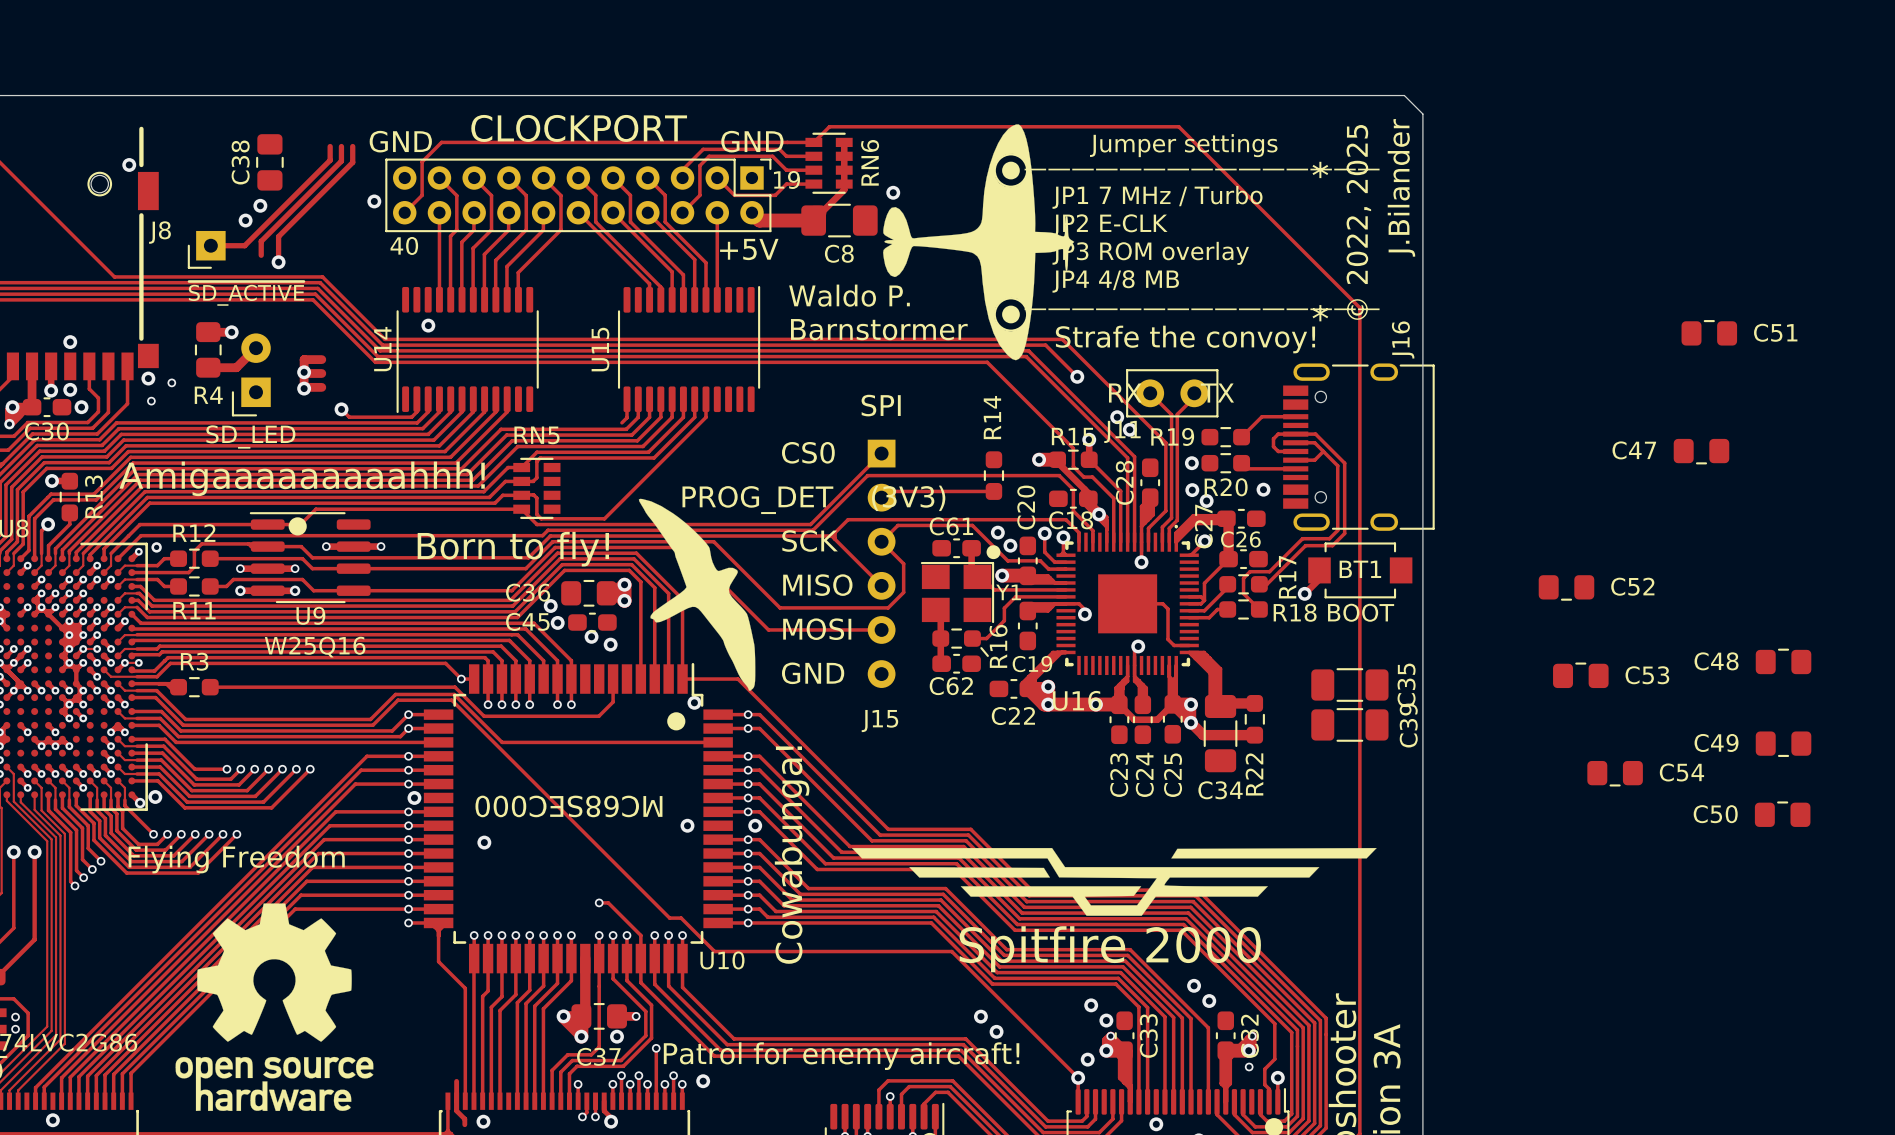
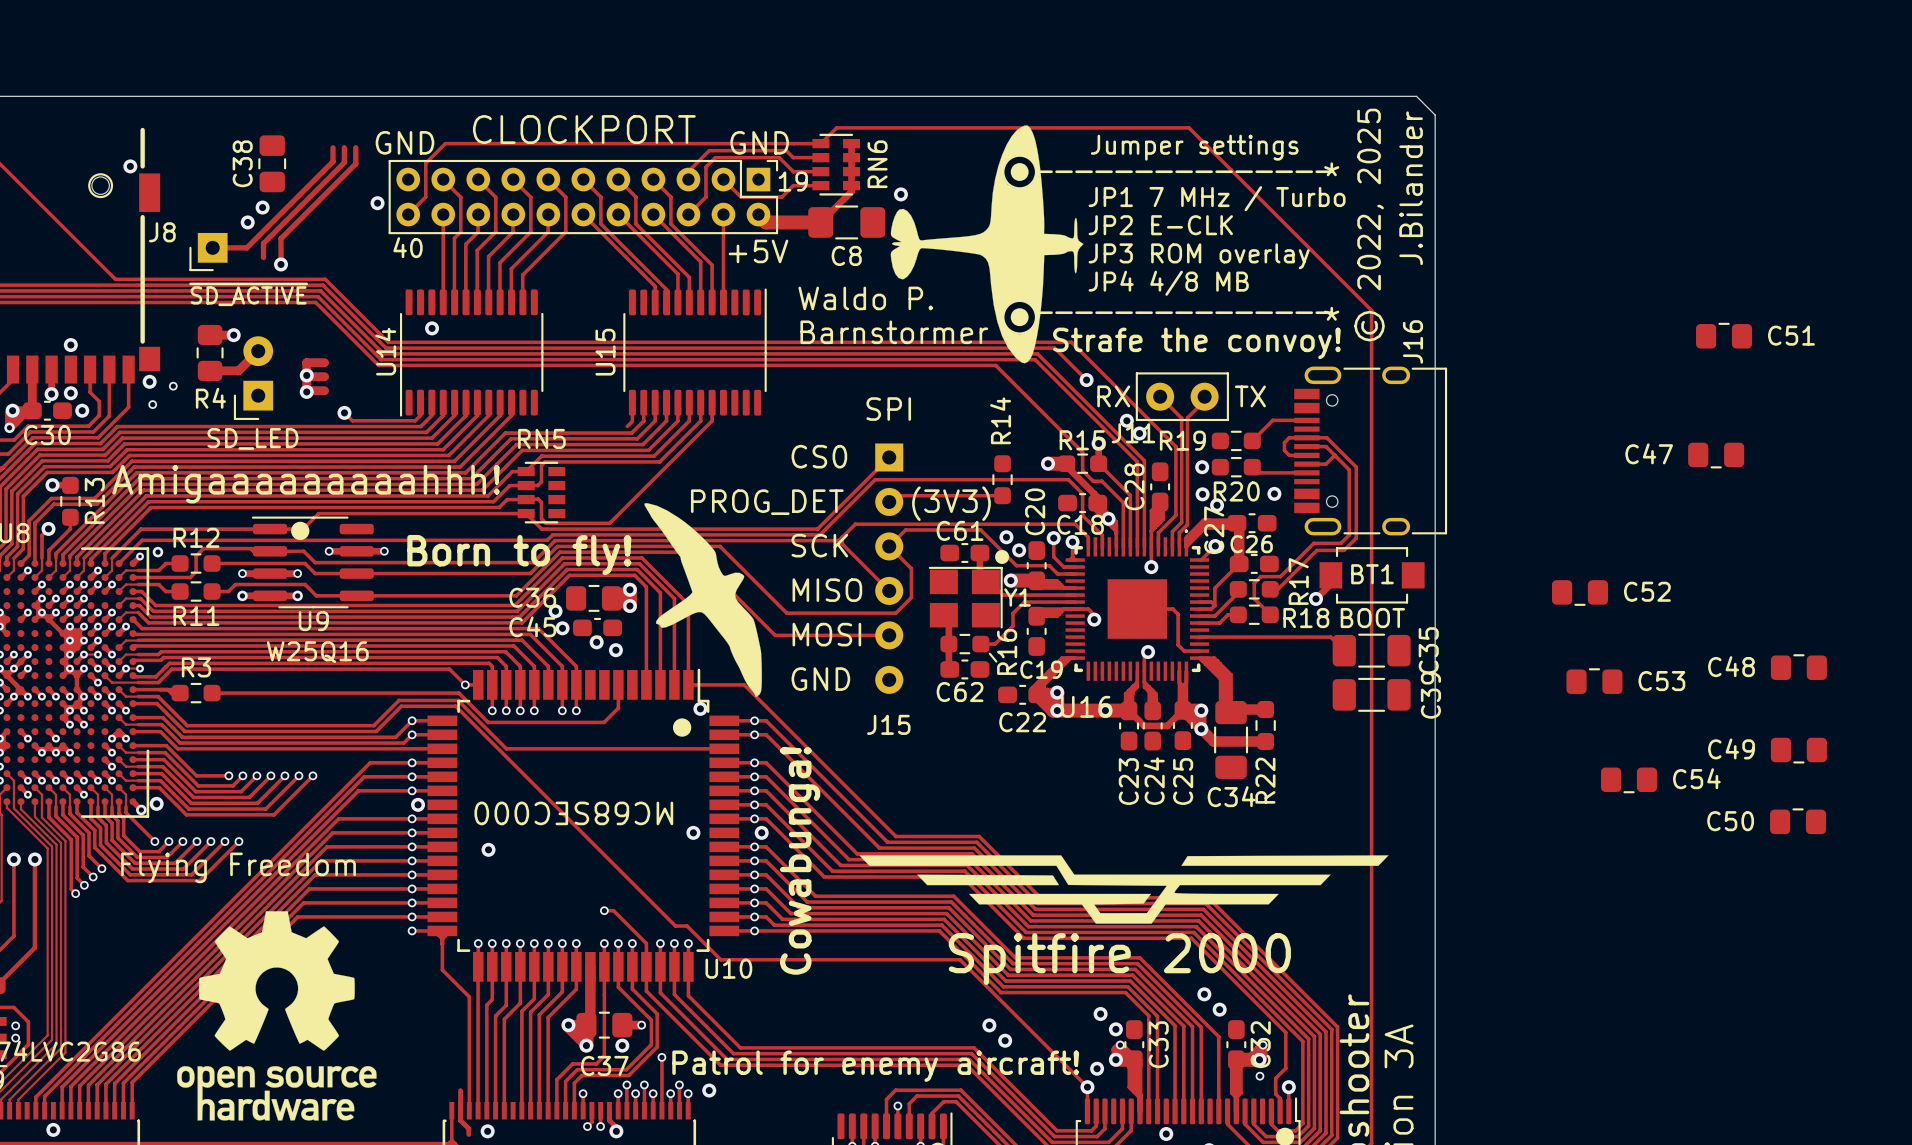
track: none -> (1199, 637) (1330, 637) (1344, 650)
C35 position: (1349, 685) -> (1371, 650)
C39 position: (1349, 724) -> (1371, 694)

